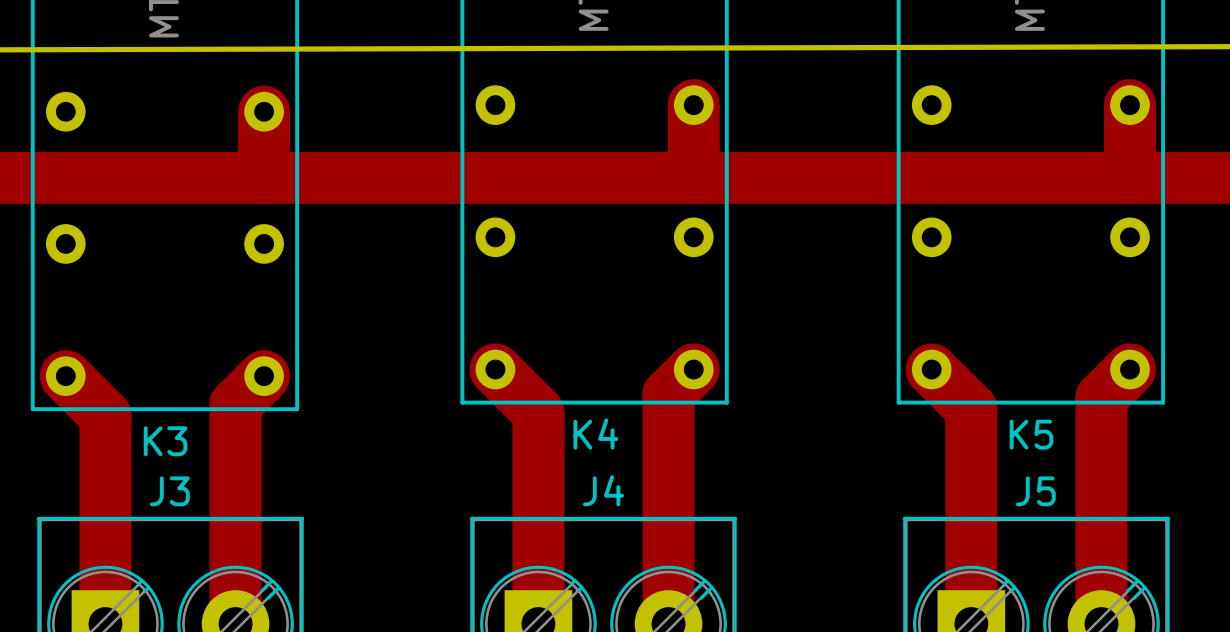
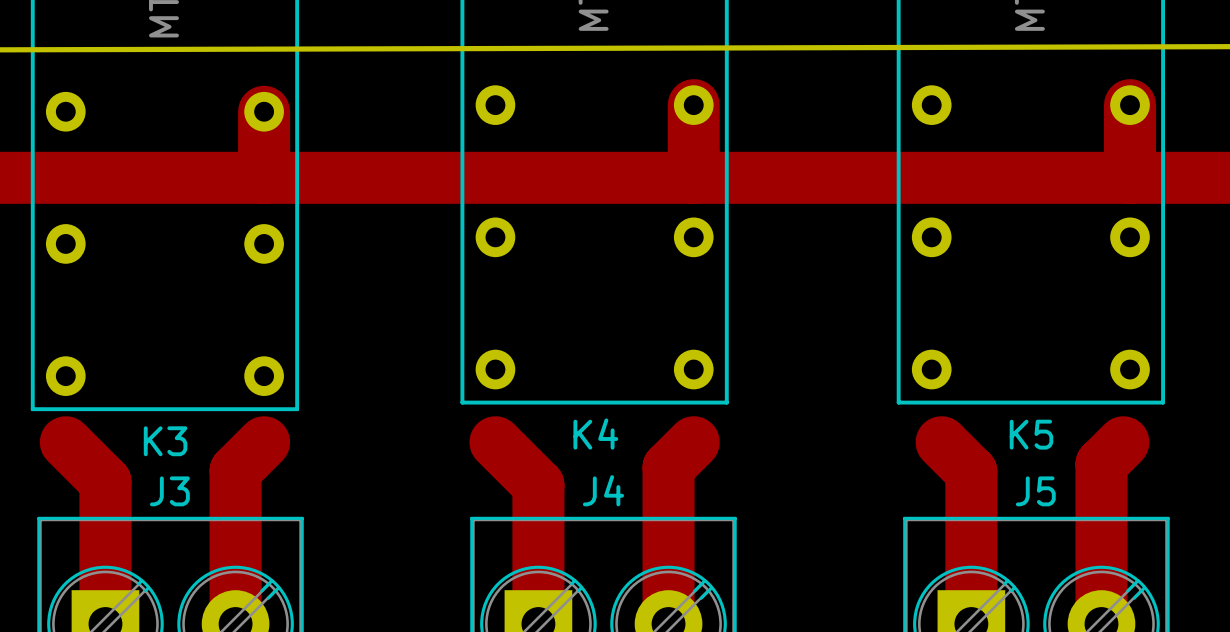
track: (495, 369) (538, 412) (538, 485) -> (495, 442) (538, 485)
track: (693, 369) (668, 394) (668, 467) -> (693, 442) (668, 467)
track: (931, 369) (971, 409) (971, 471) -> (941, 442) (971, 471)
track: (1130, 369) (1101, 398) (1101, 464) -> (1123, 442) (1101, 464)
track: (65, 376) (105, 415) (105, 481) -> (65, 442) (105, 481)
track: (264, 376) (235, 404) (235, 470) -> (264, 442) (235, 470)

